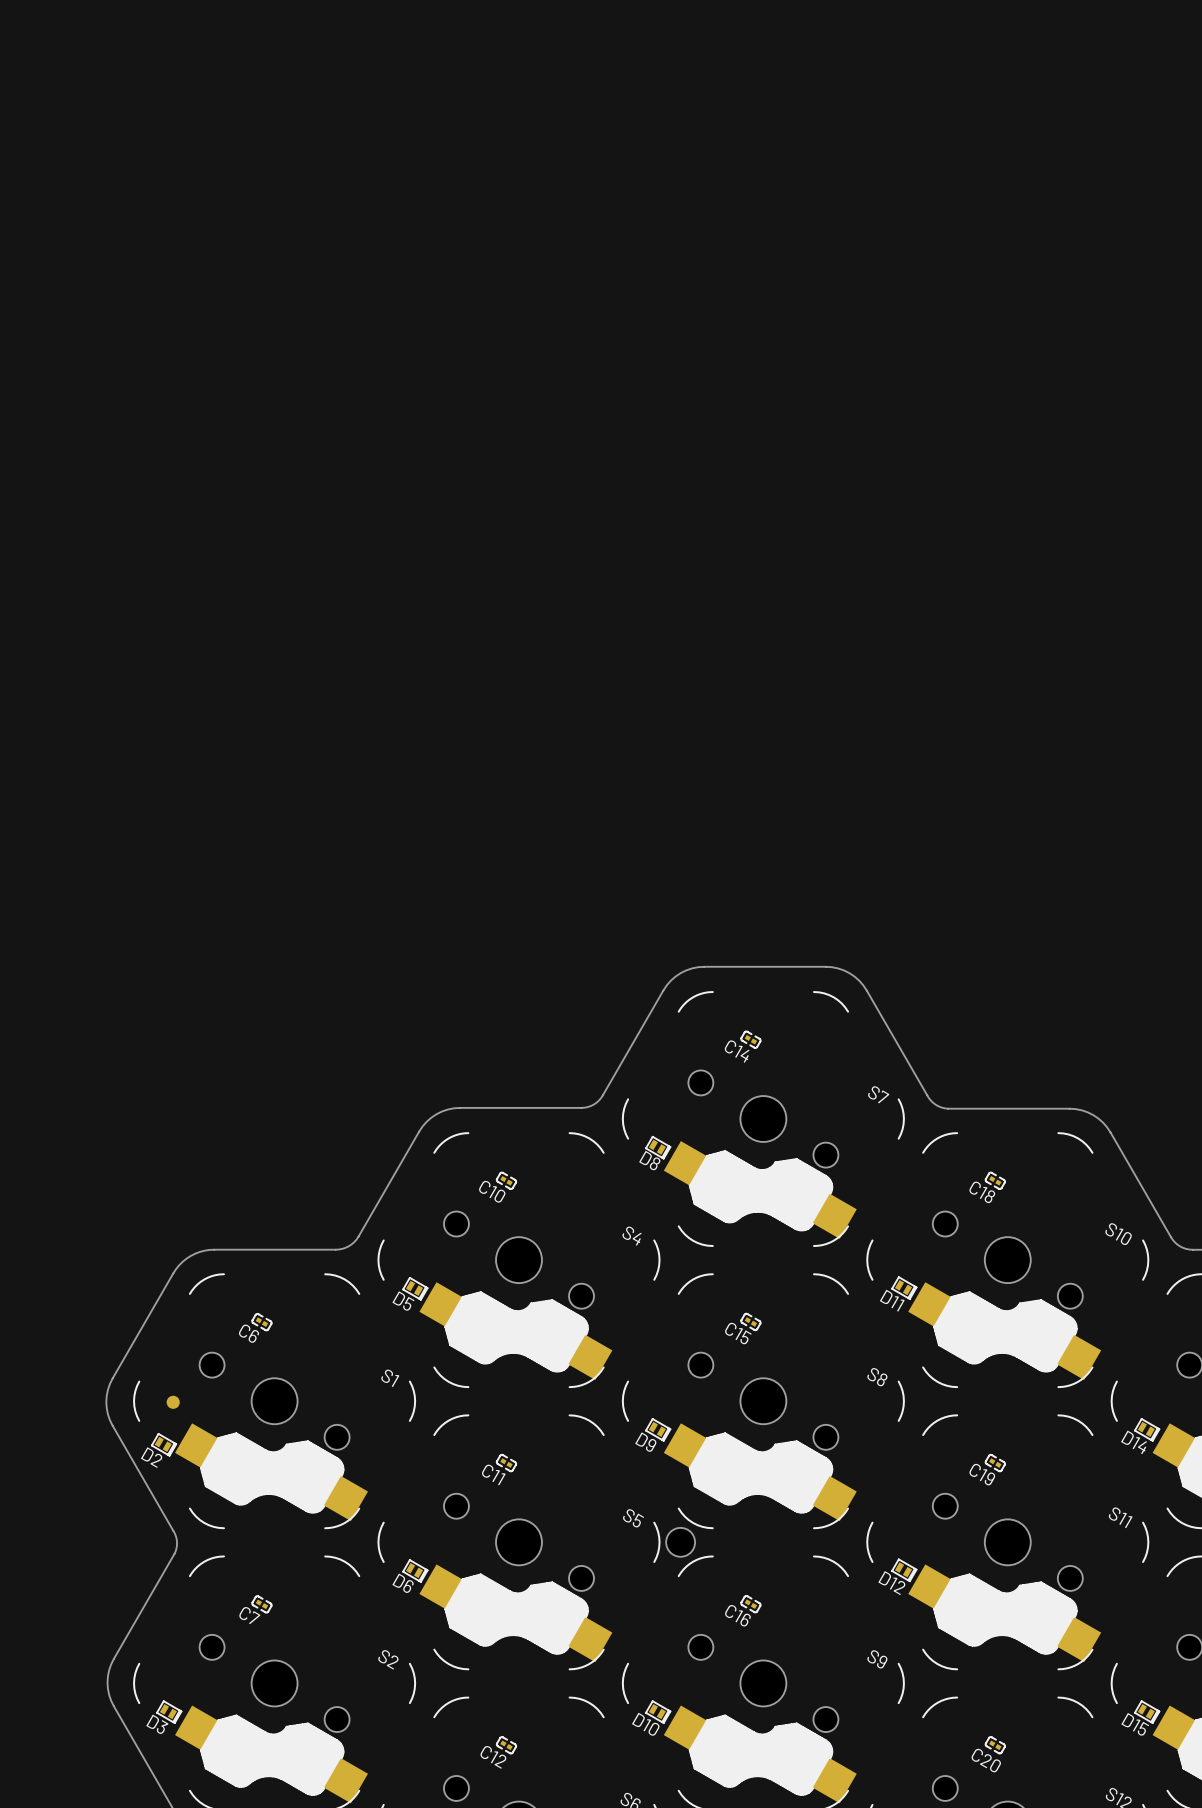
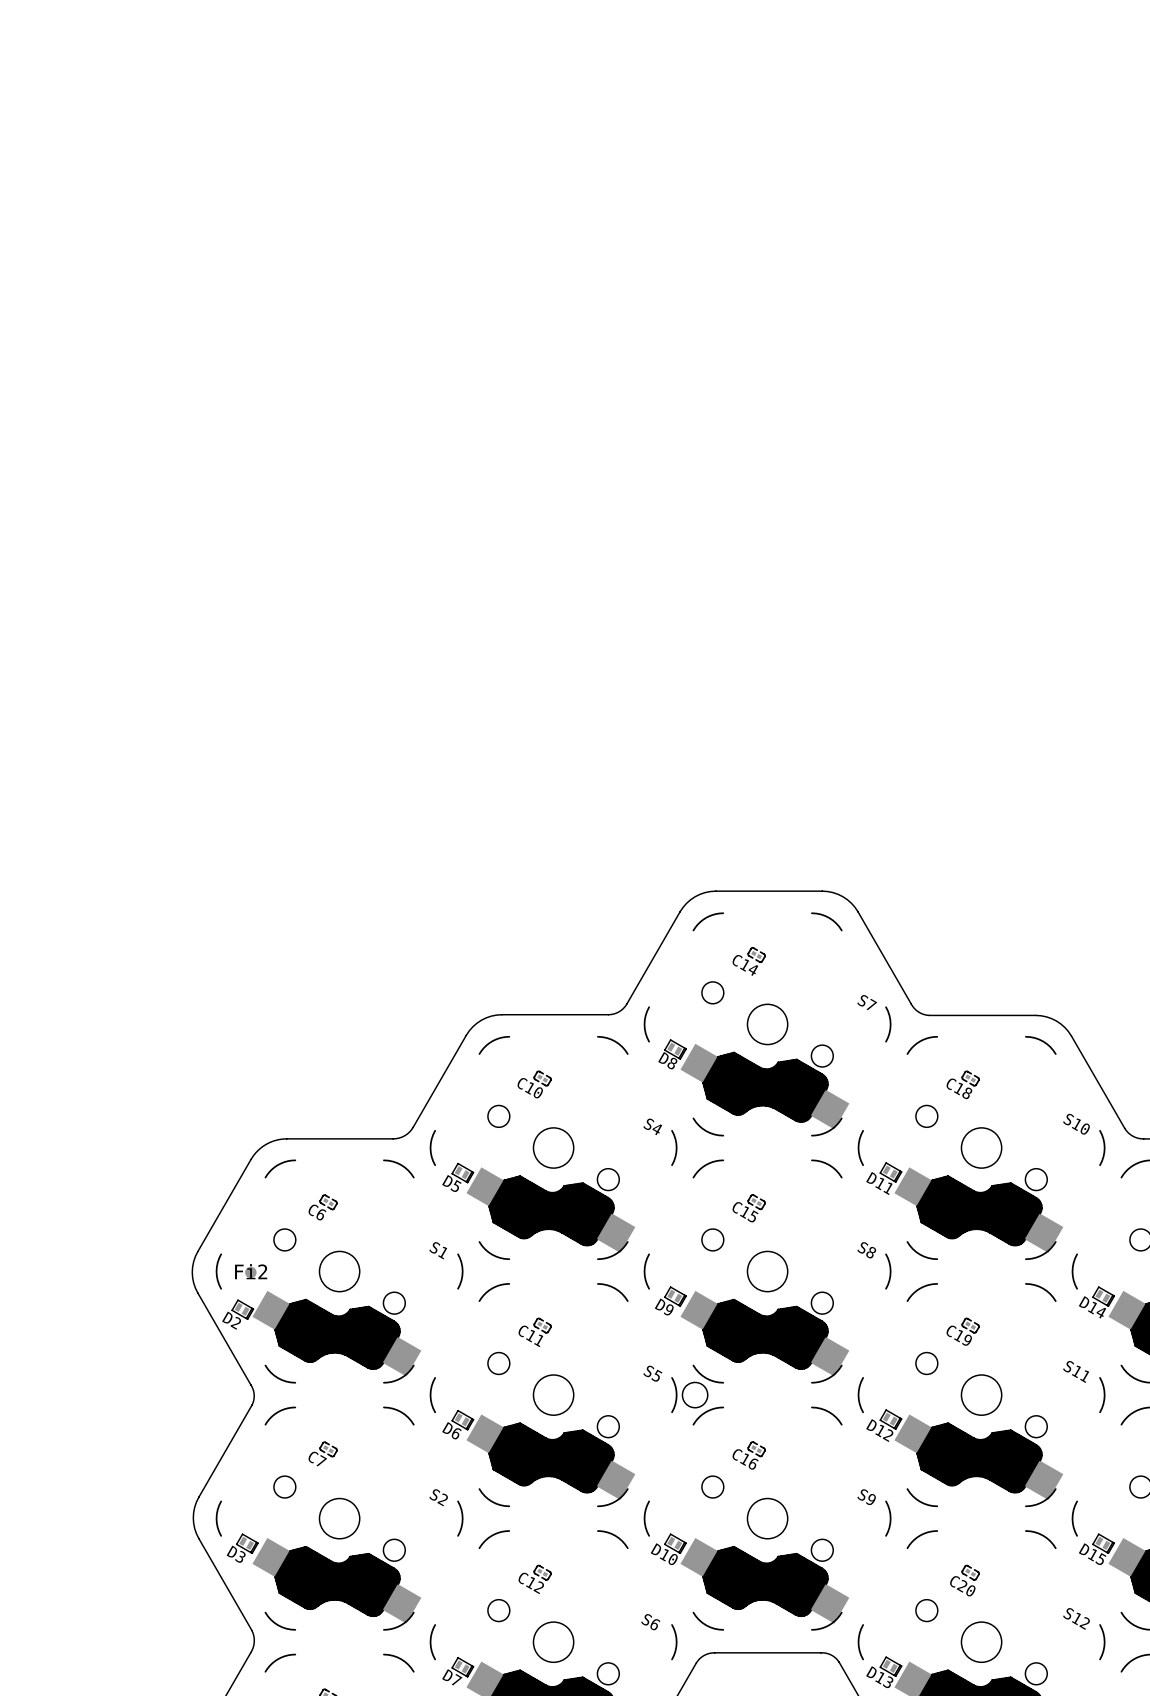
Fi2 name: none -> Fi2 (251, 1271)

